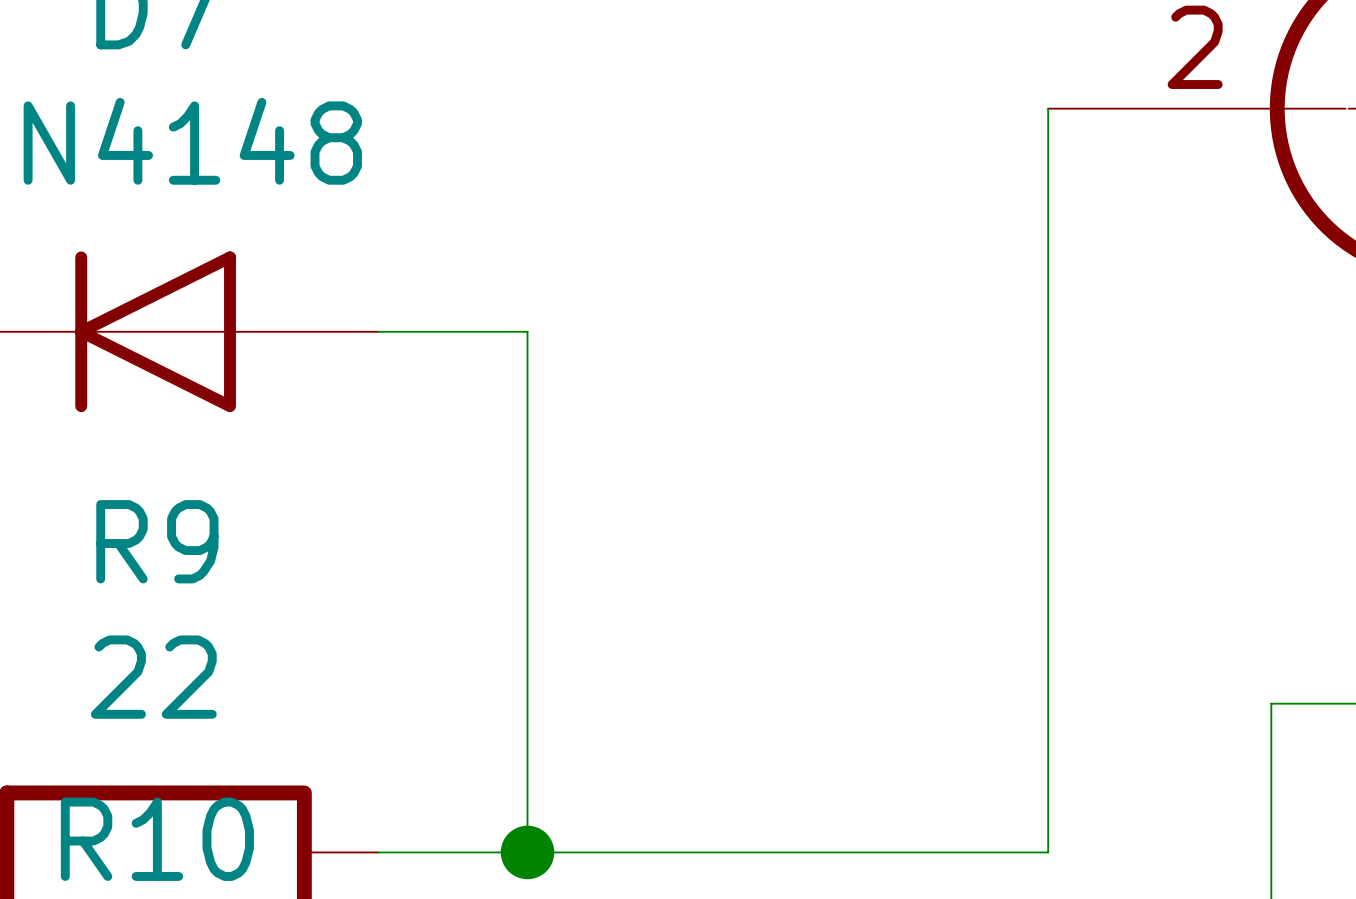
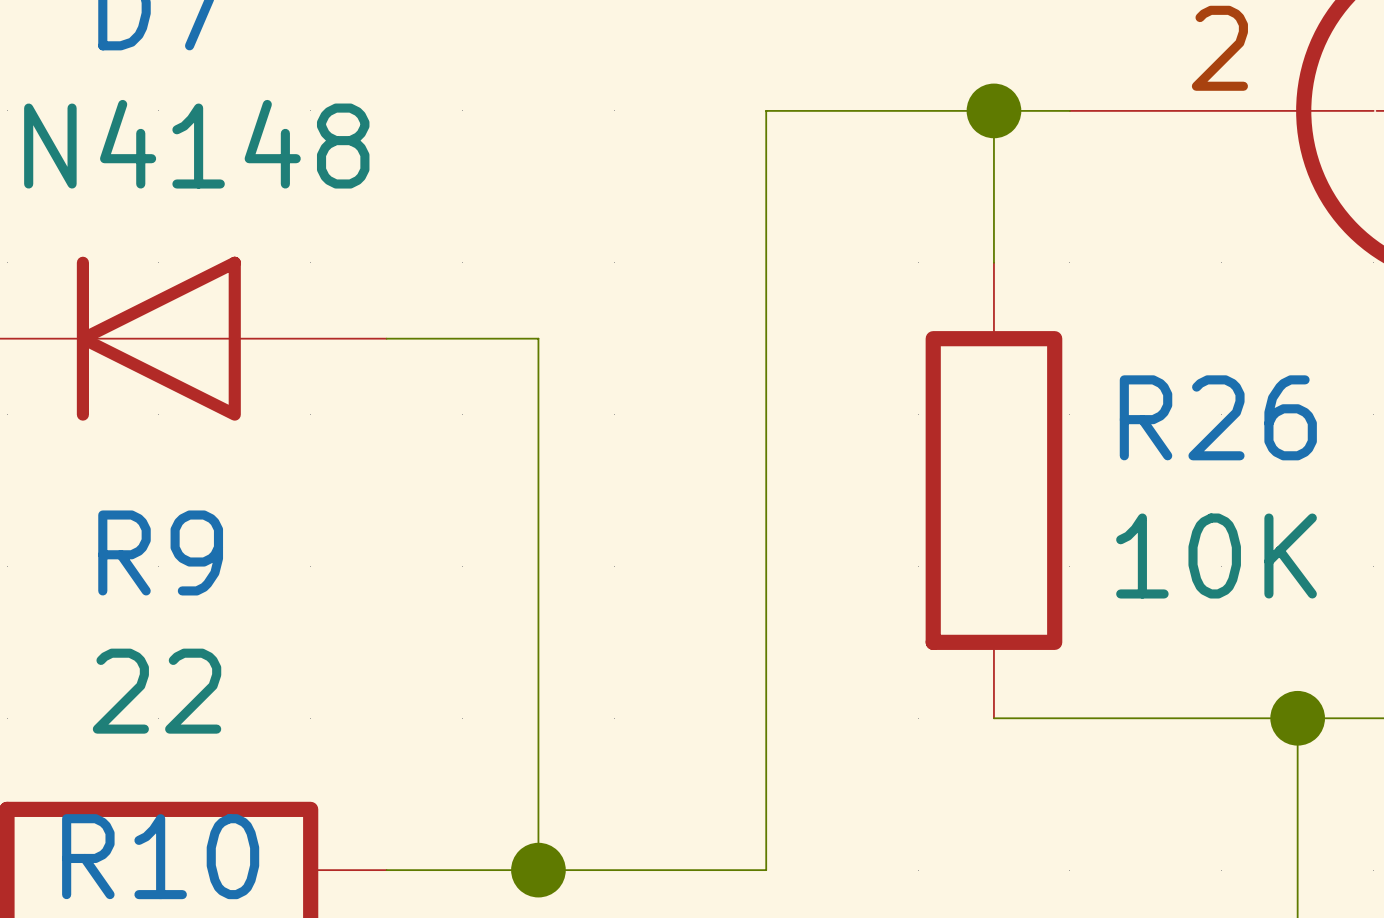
wire: none -> (993, 110) (993, 262)
junction: none -> (993, 110)
wire: (1048, 108) (1048, 852) (750, 852) -> (1069, 110) (766, 110) (766, 870)
R26: none -> 10K (993, 490)
wire: none -> (993, 718) (1297, 718)
junction: none -> (1297, 718)

